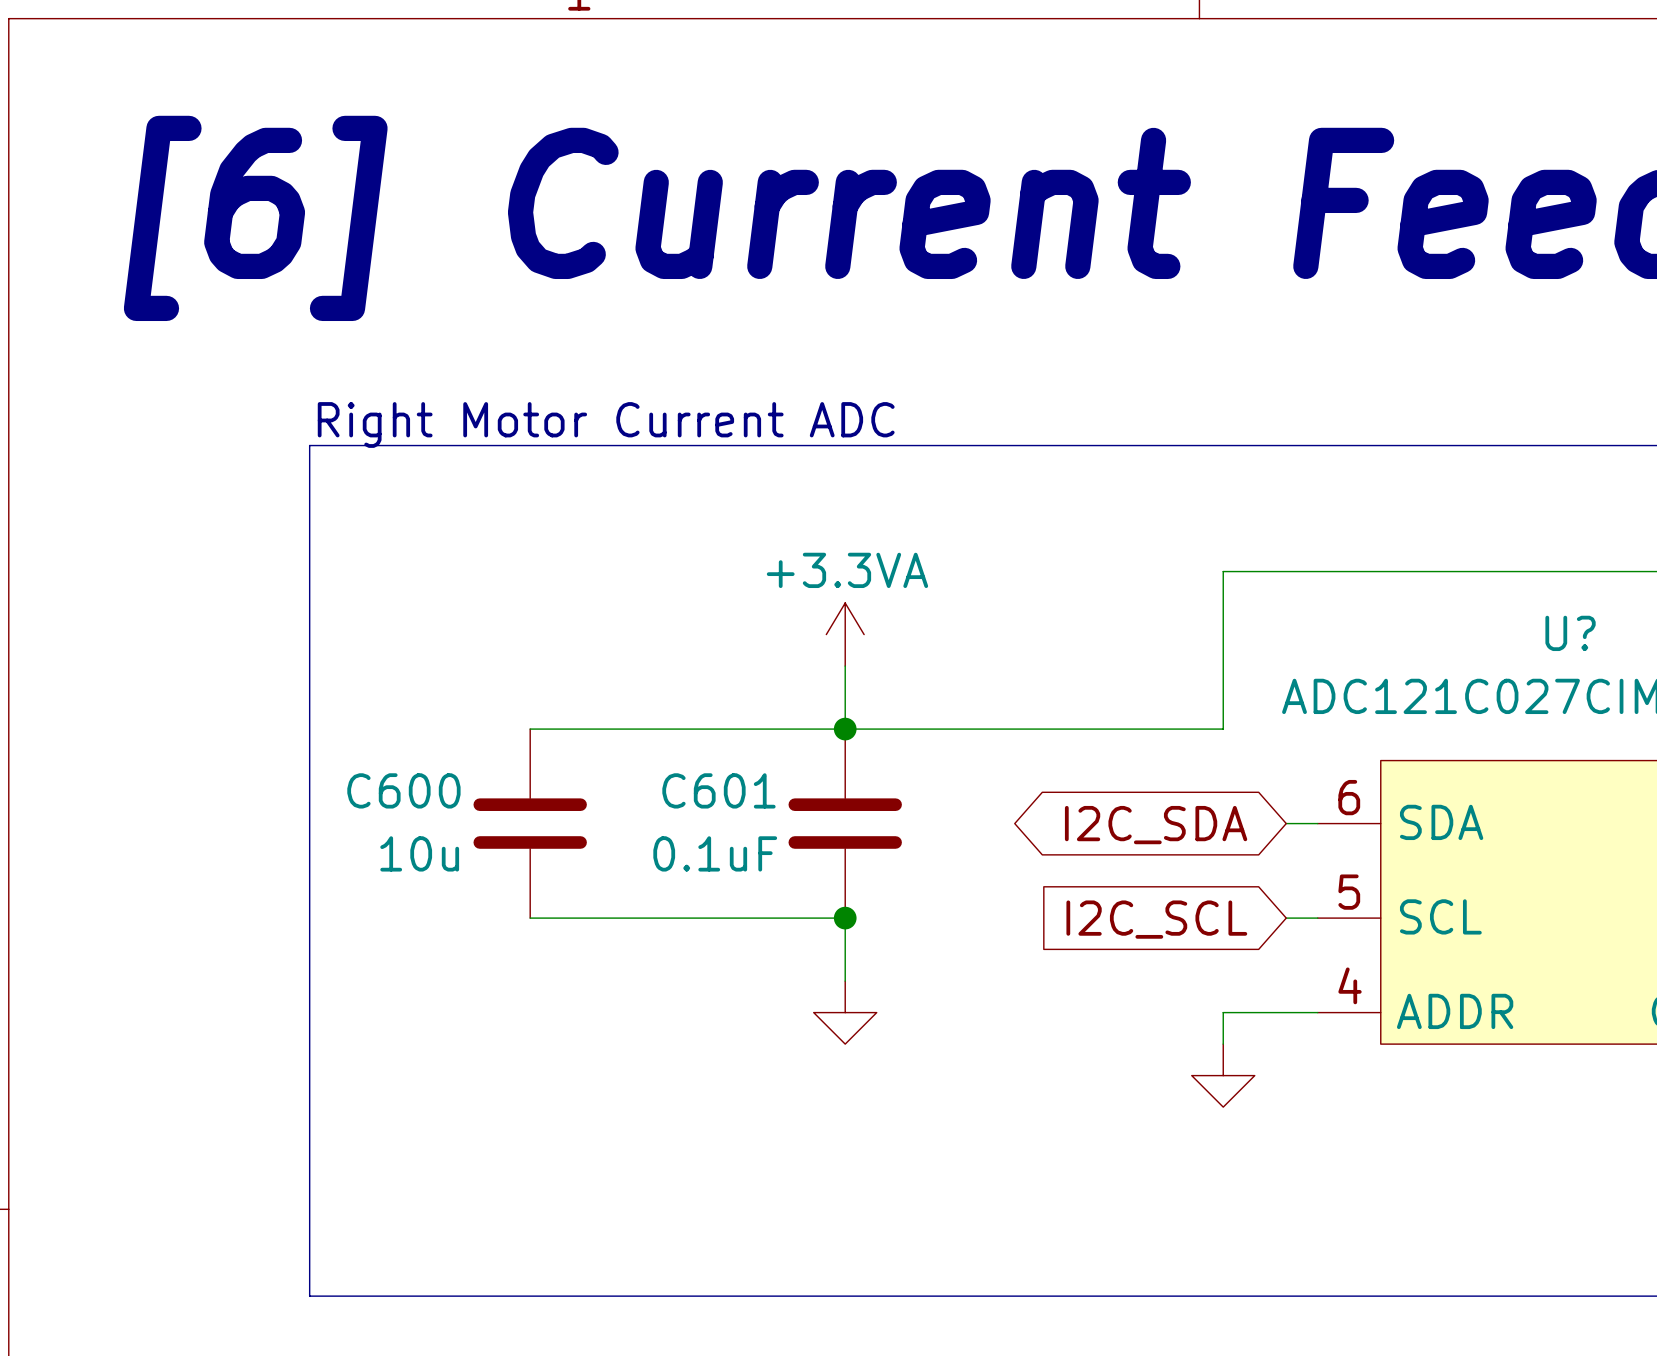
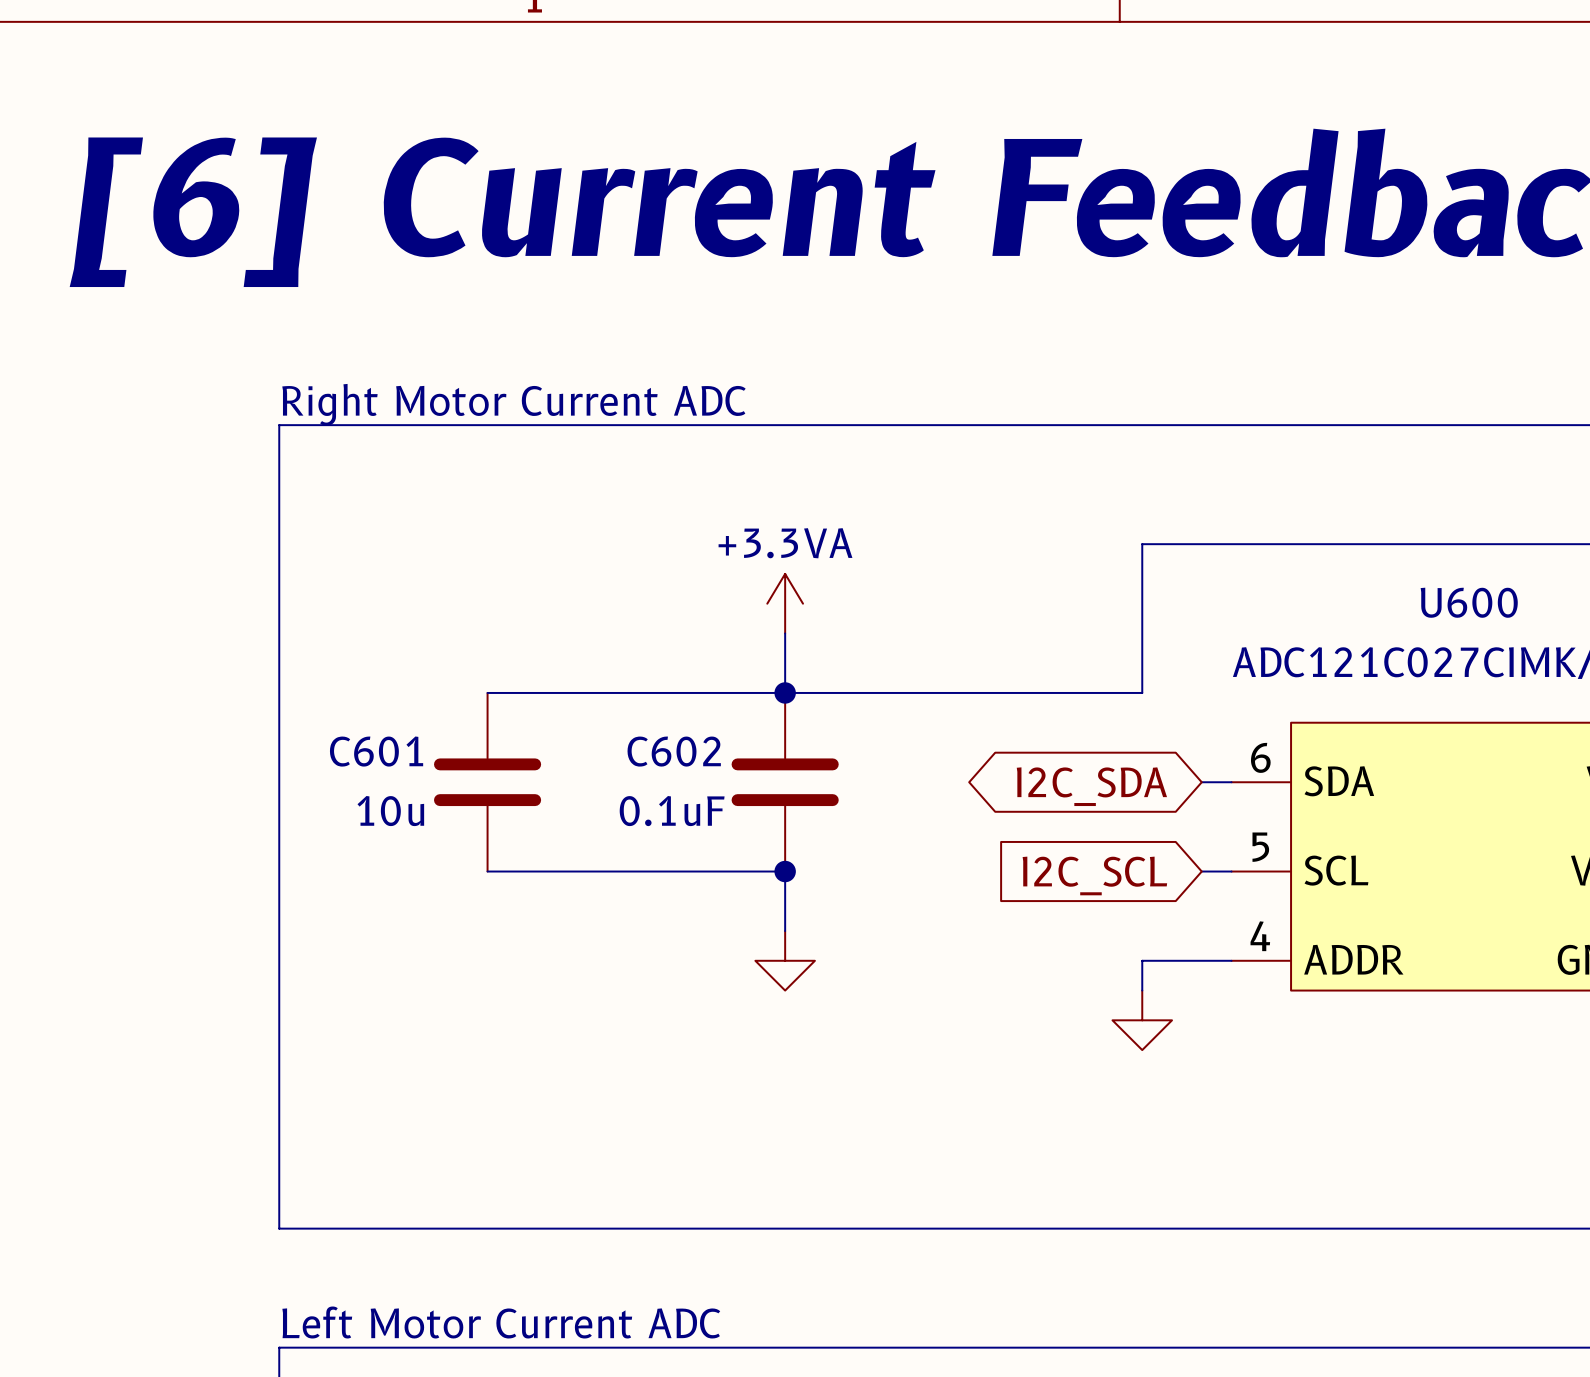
U? name: U? (1570, 633) -> U600 (1469, 602)
C600 name: C600 (403, 790) -> C601 (376, 751)
C601 name: C601 (718, 790) -> C602 (674, 751)

